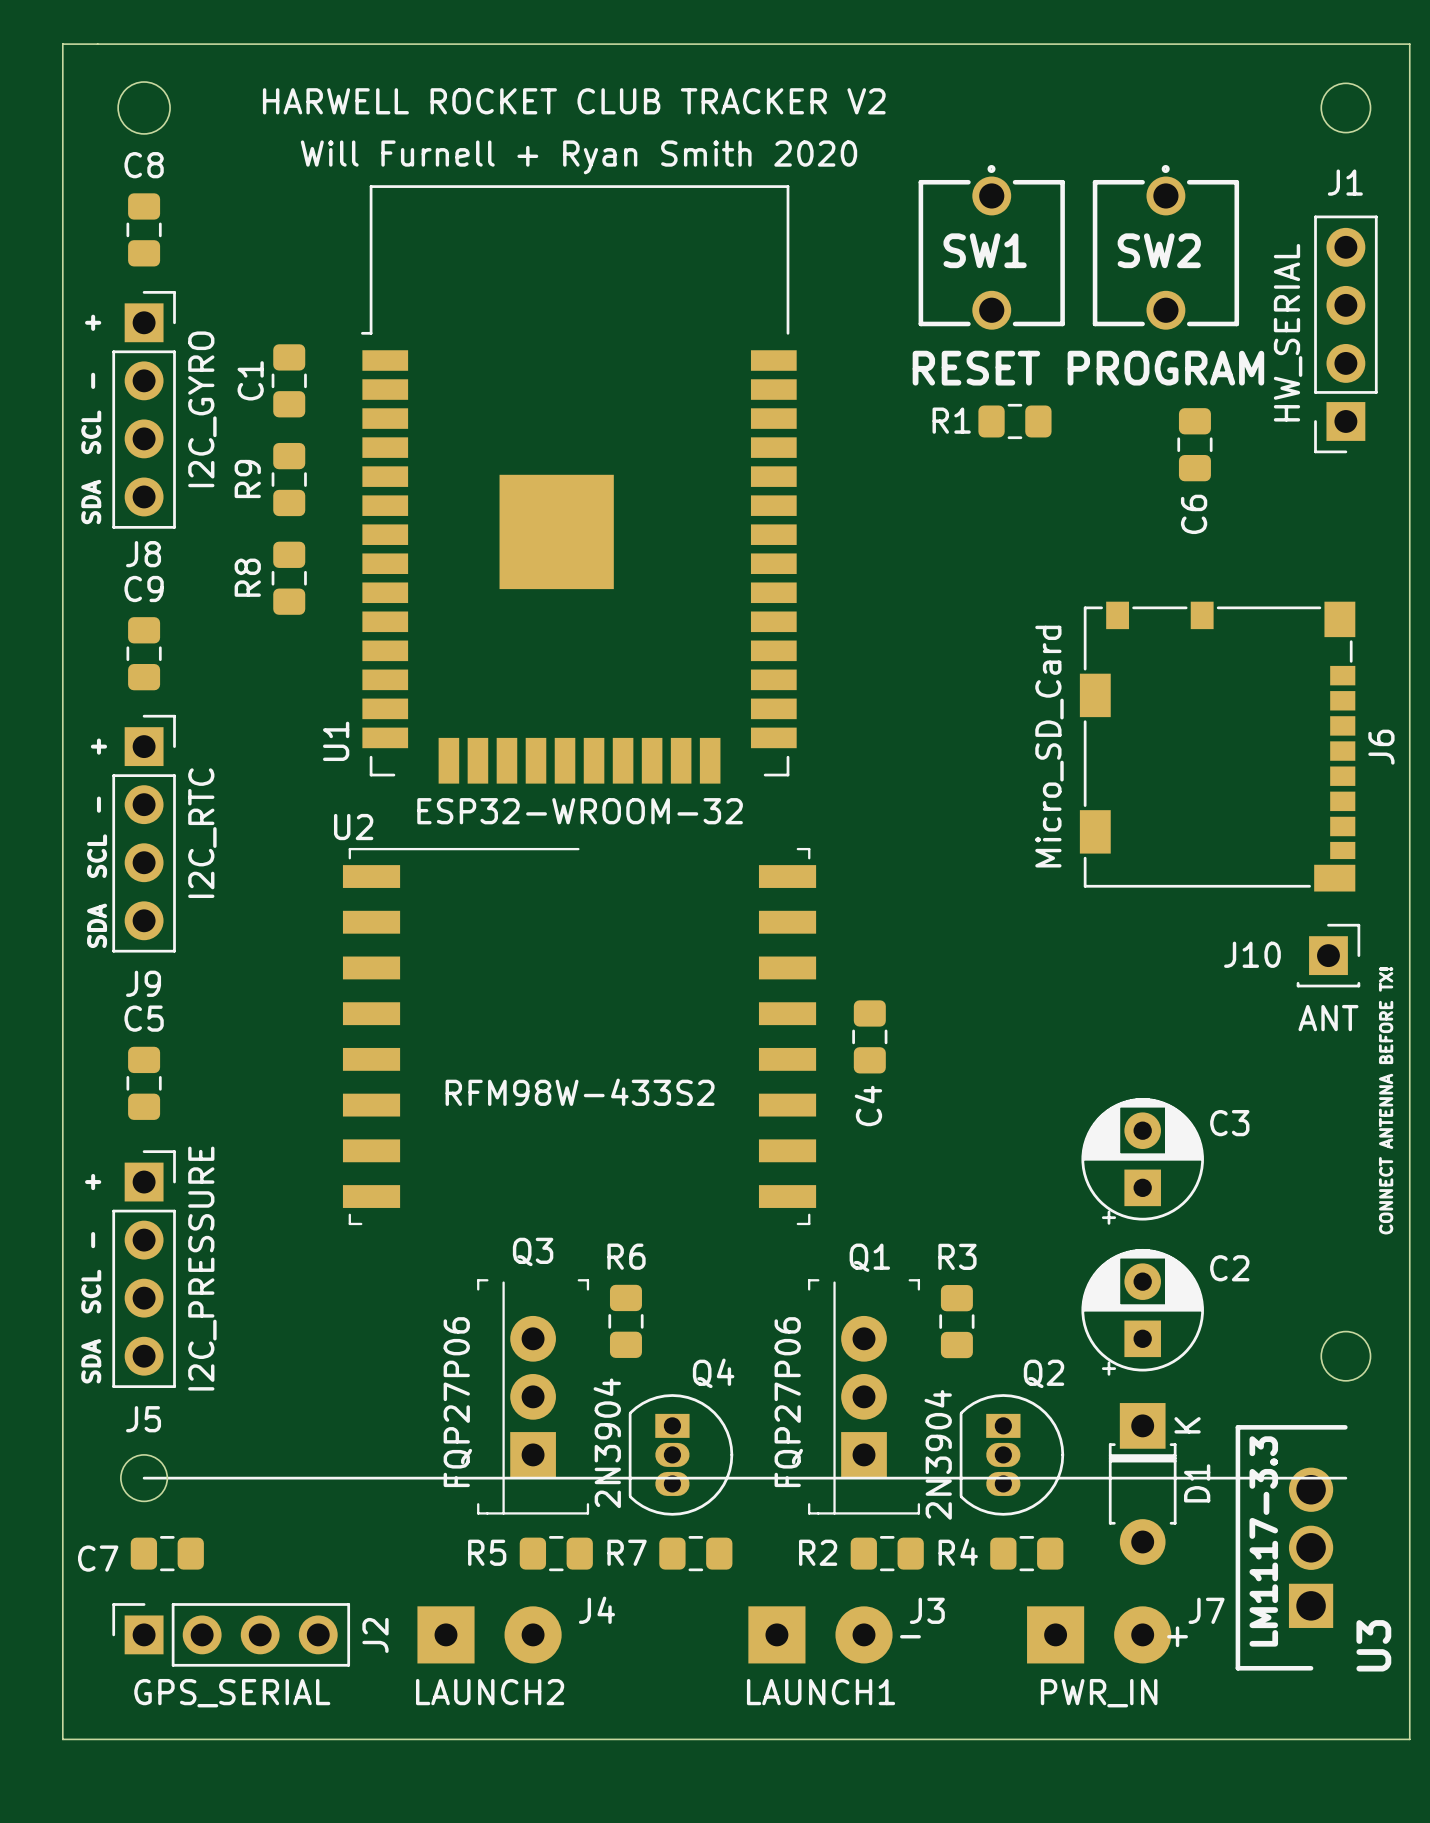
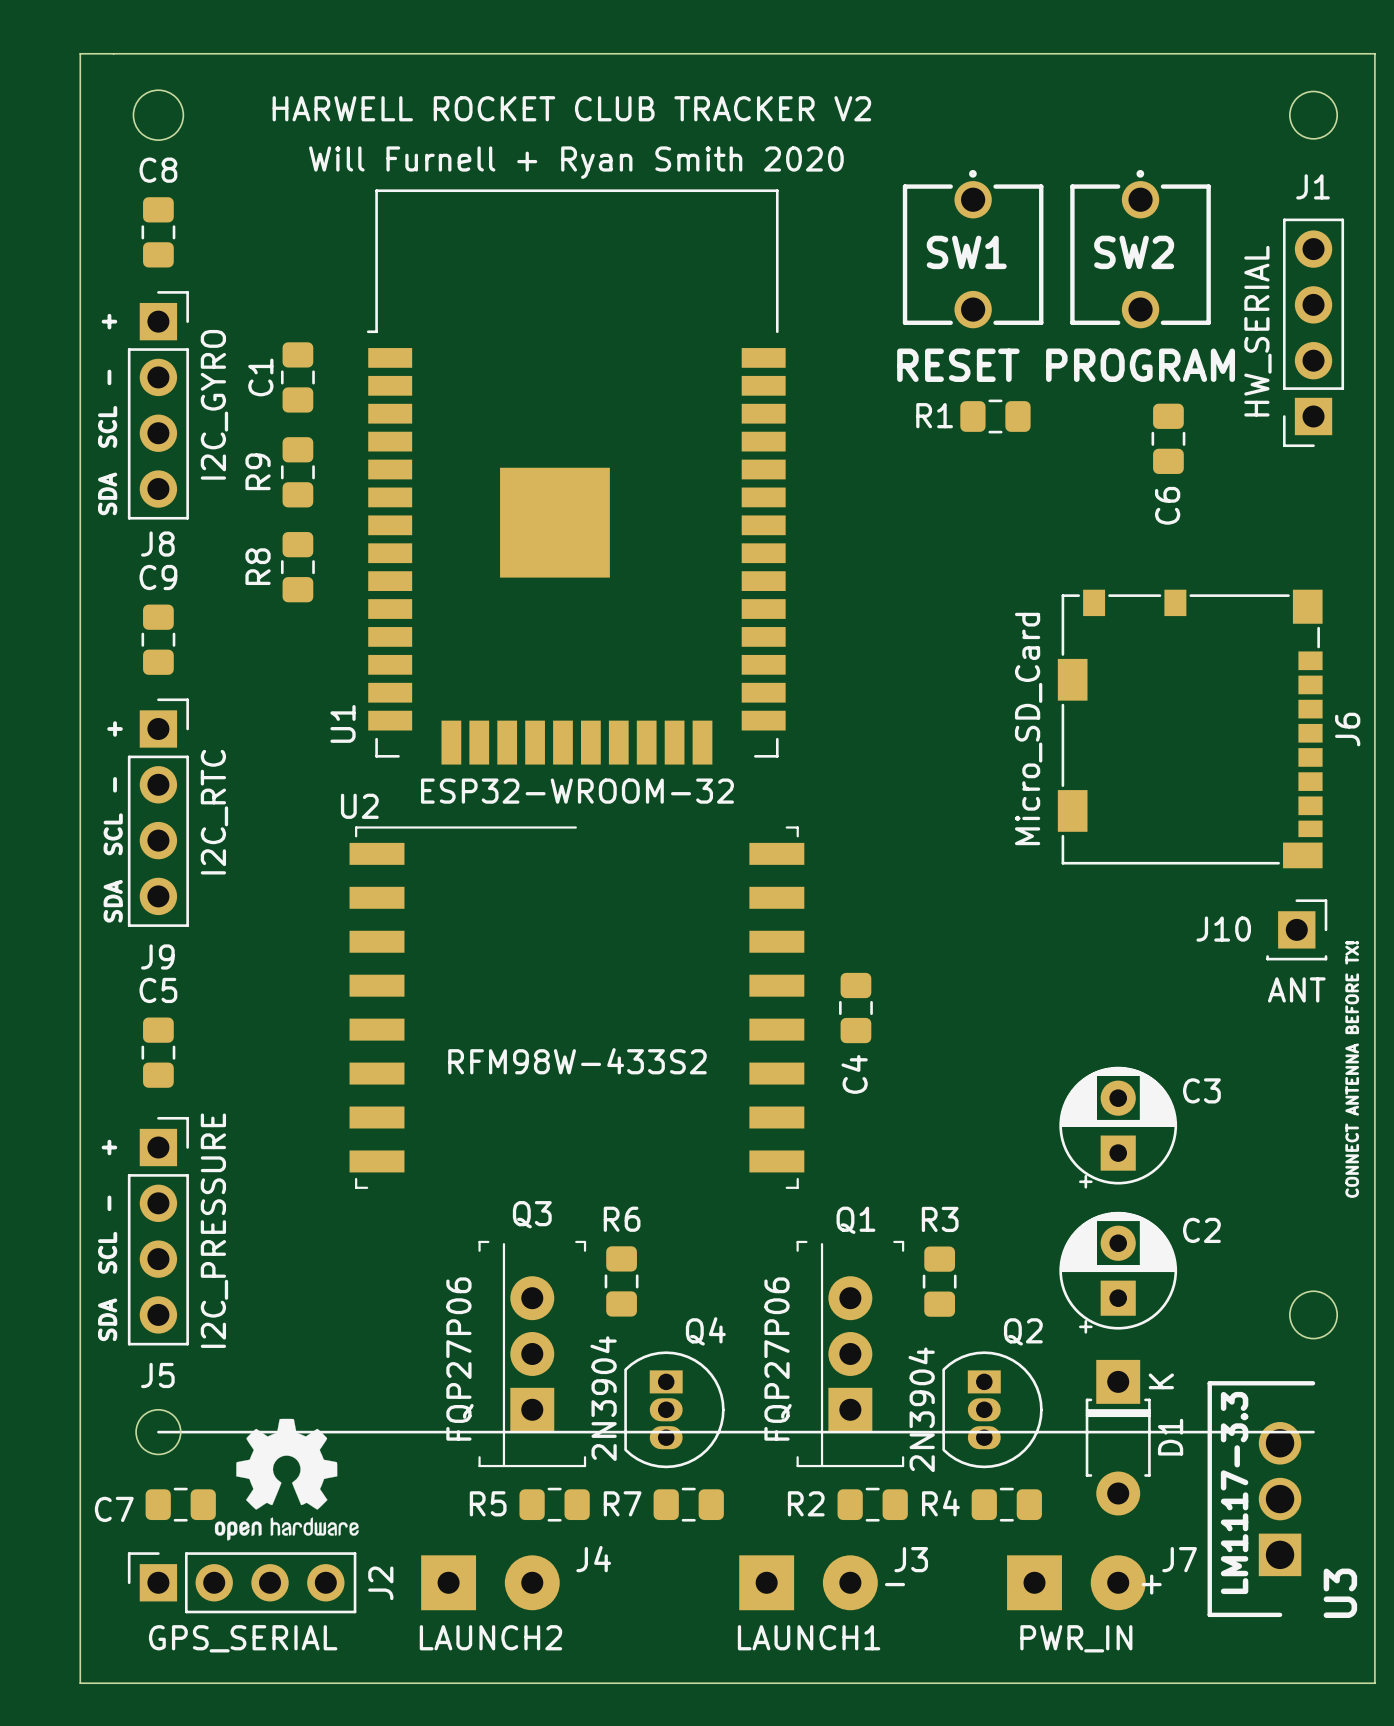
drawing: none -> [214, 1418, 359, 1541]

